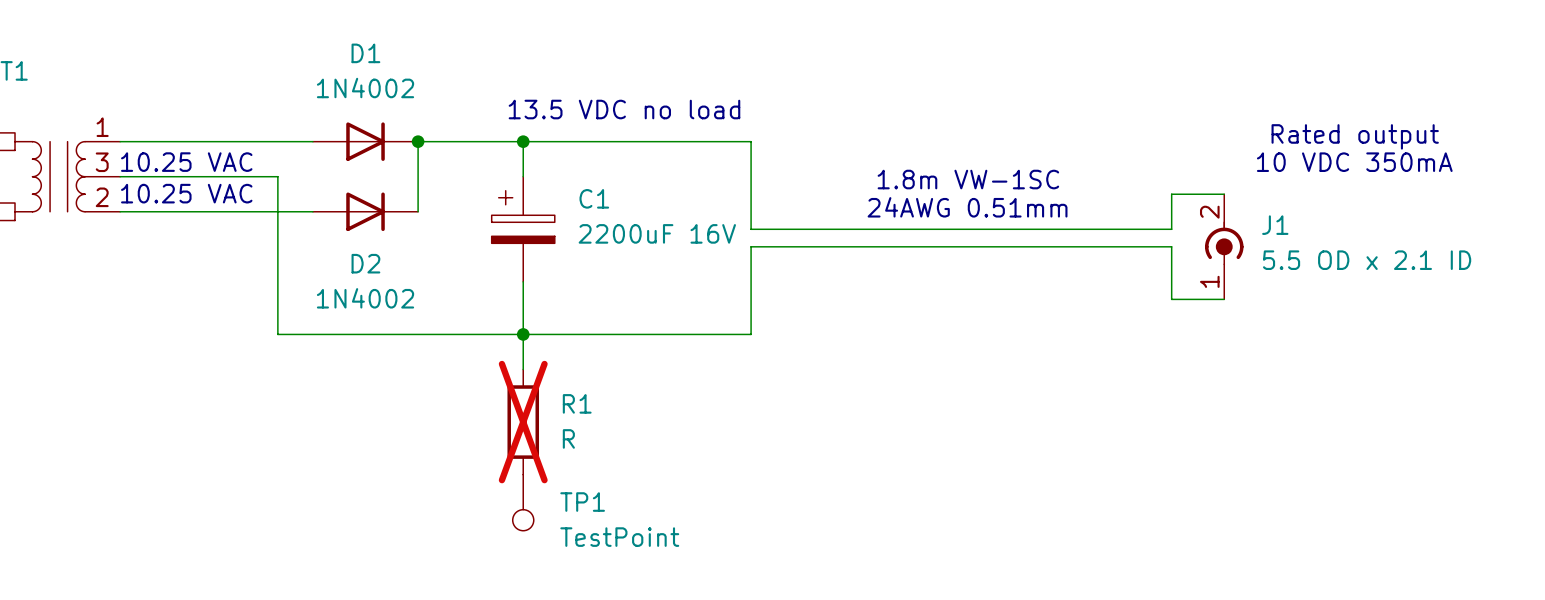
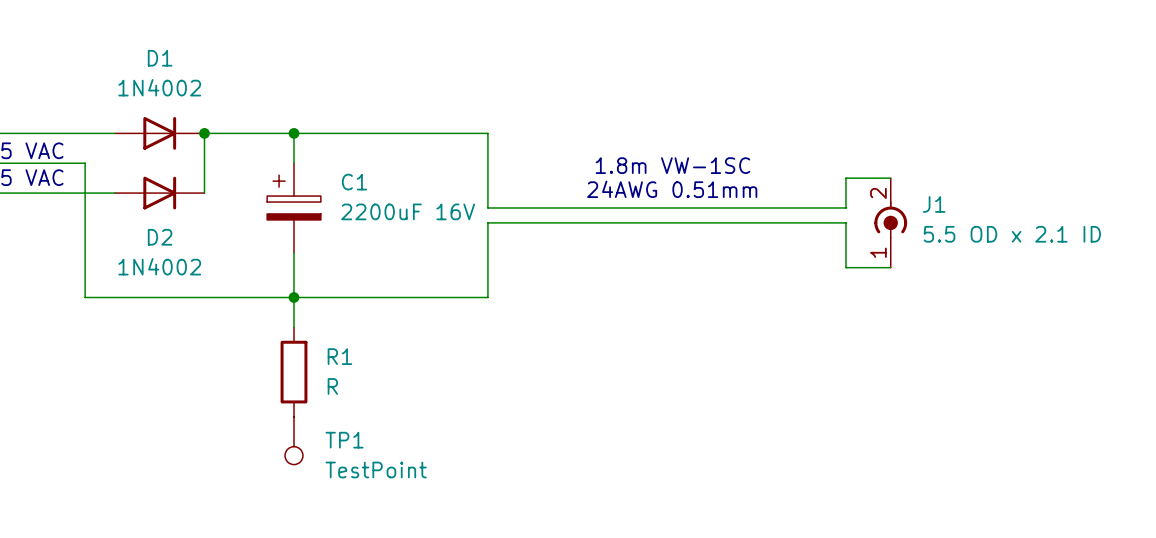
text: 13.5 VDC no load (624, 109) -> none
text: Rated output (1355, 136) -> none
text: 10 VDC 350mA (1354, 162) -> none
R1 do-not-place cross: (523, 422) -> none

